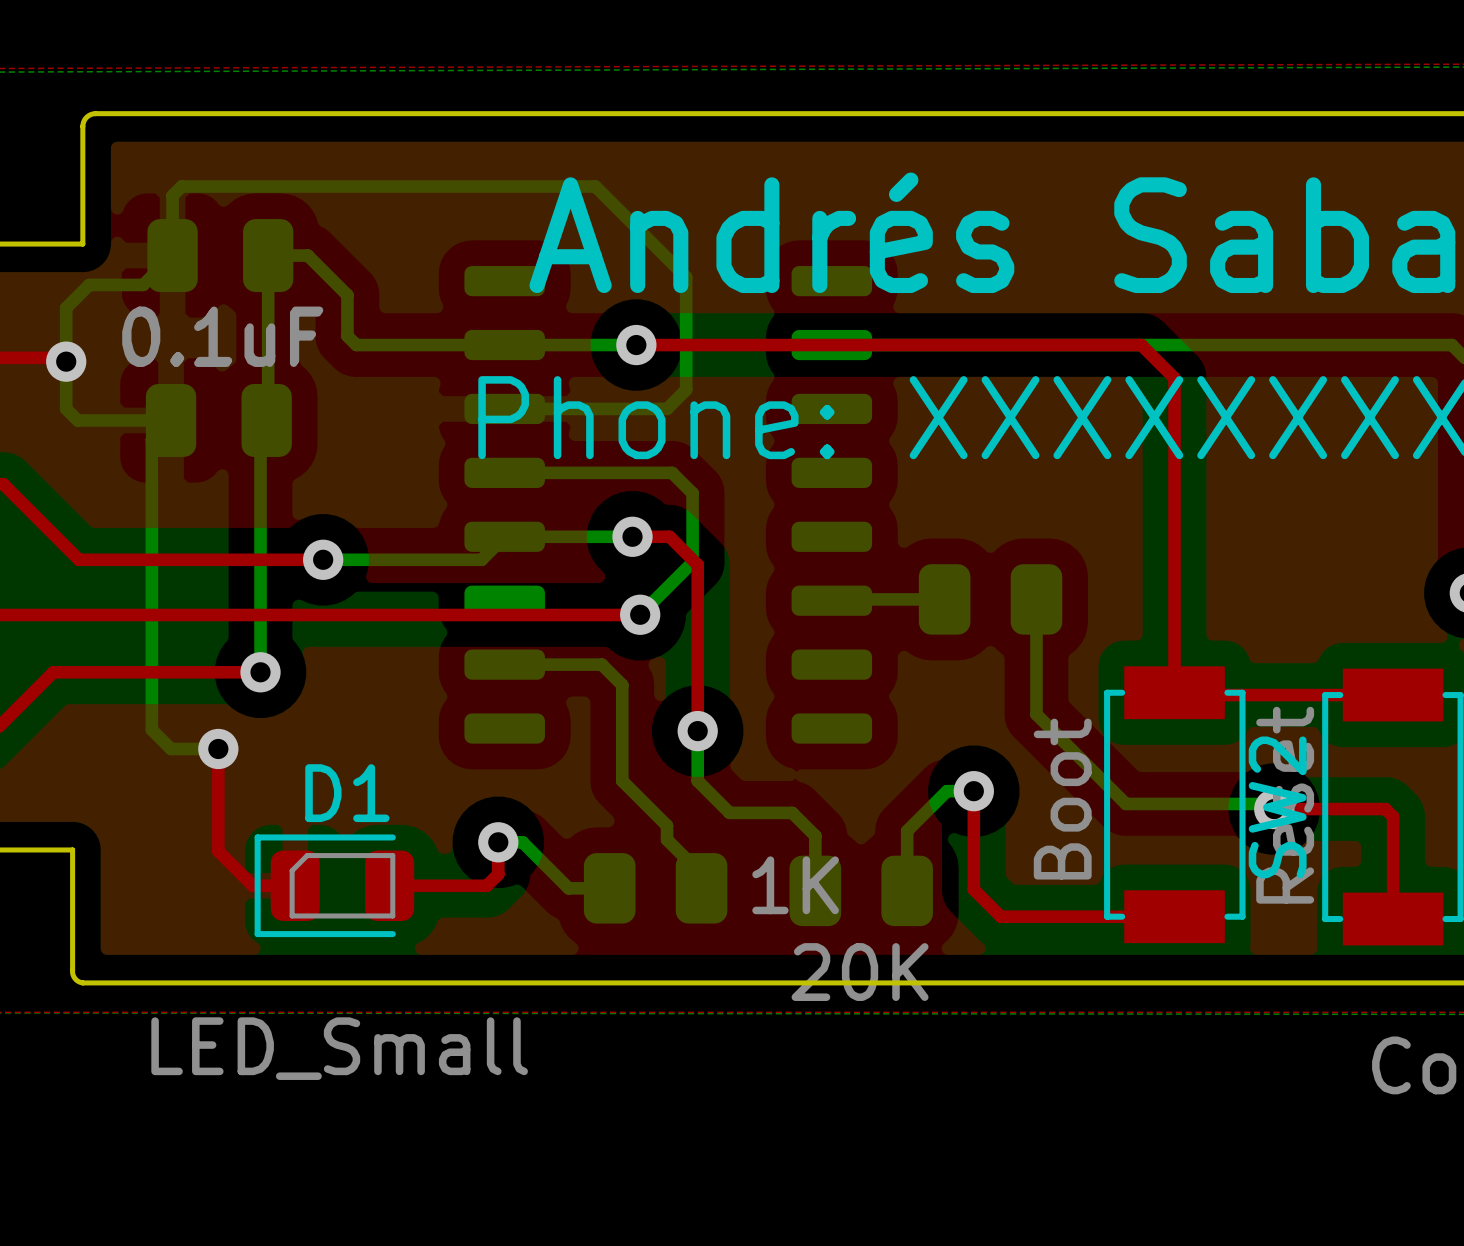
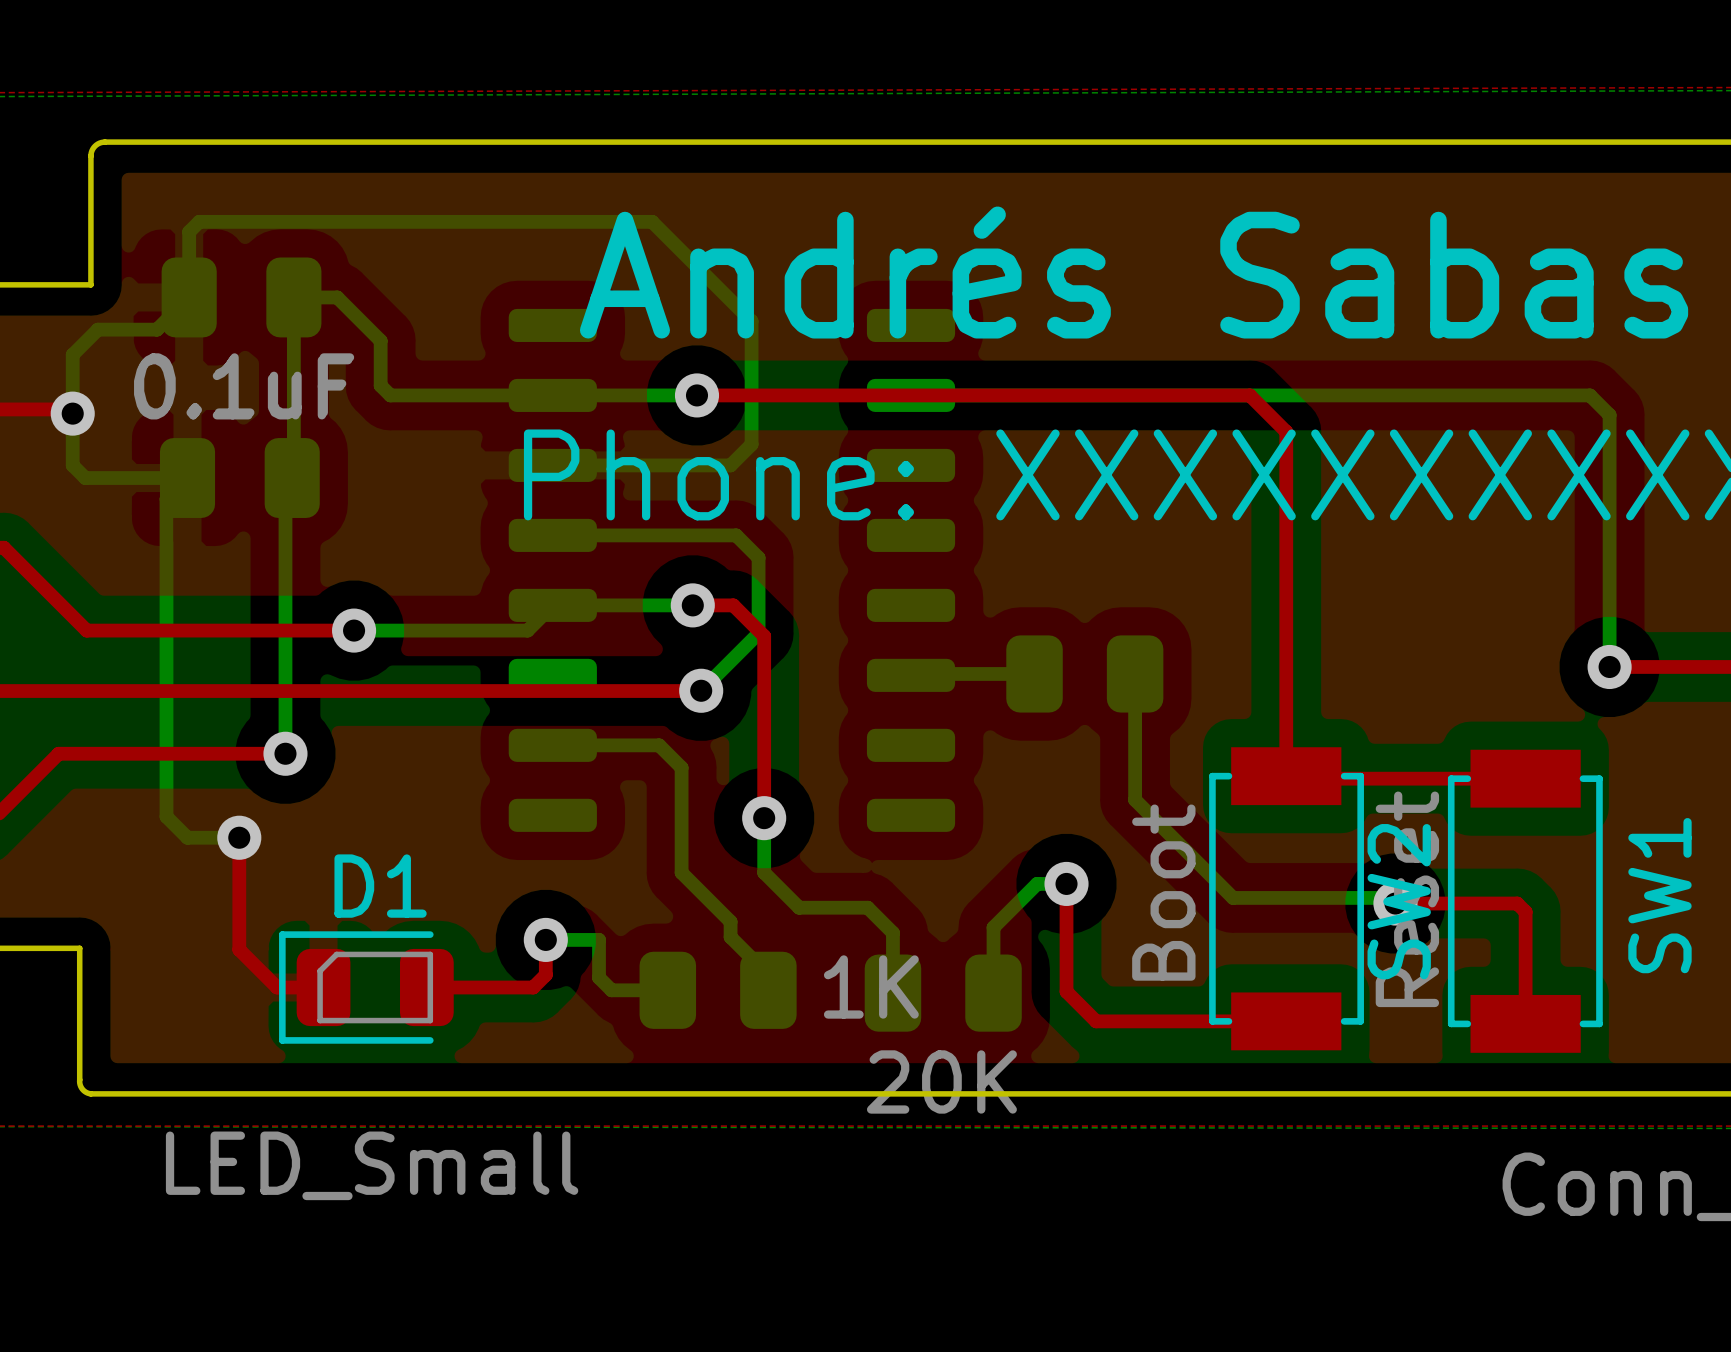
bottom track: (522, 842) (568, 888) -> (572, 939) (599, 939) (599, 977) (611, 990) (622, 990)

